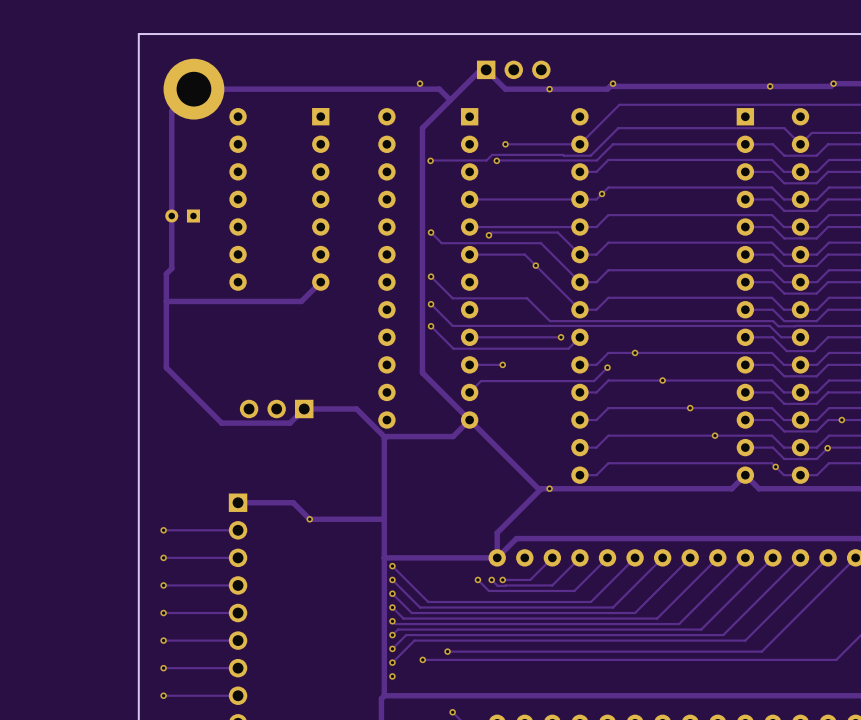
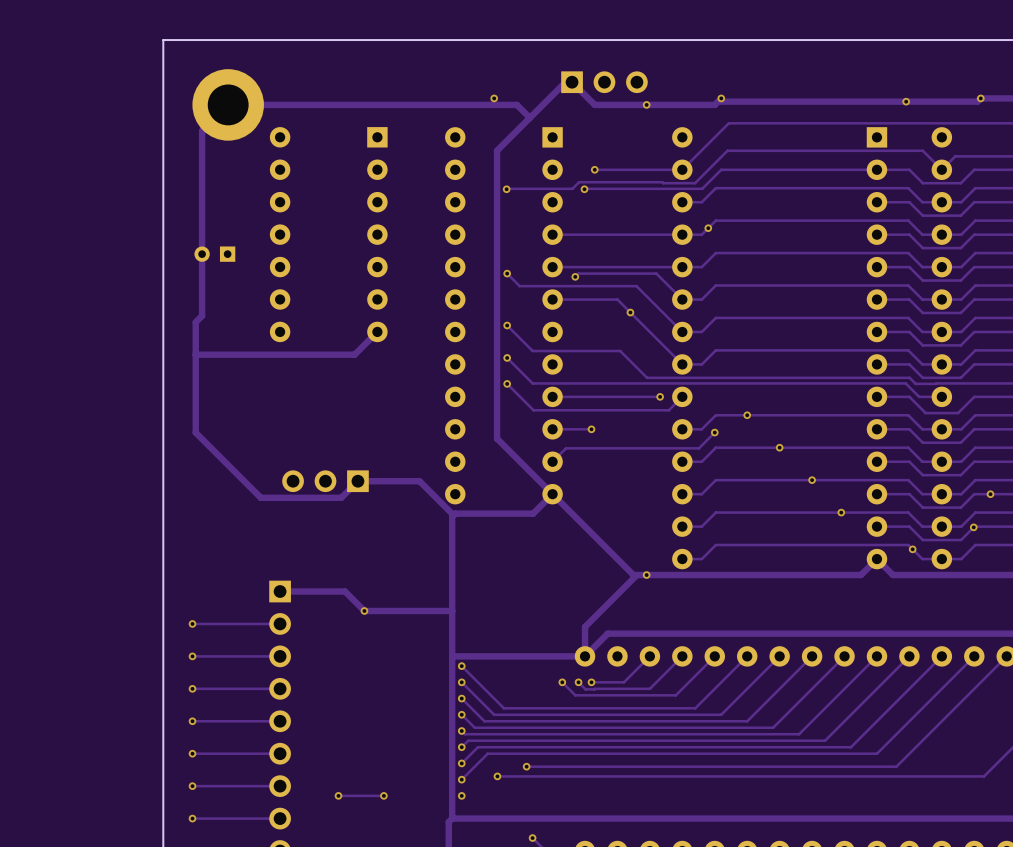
via: none -> (338, 795)
track: none -> (383, 795) (338, 795)
via: none -> (383, 795)

